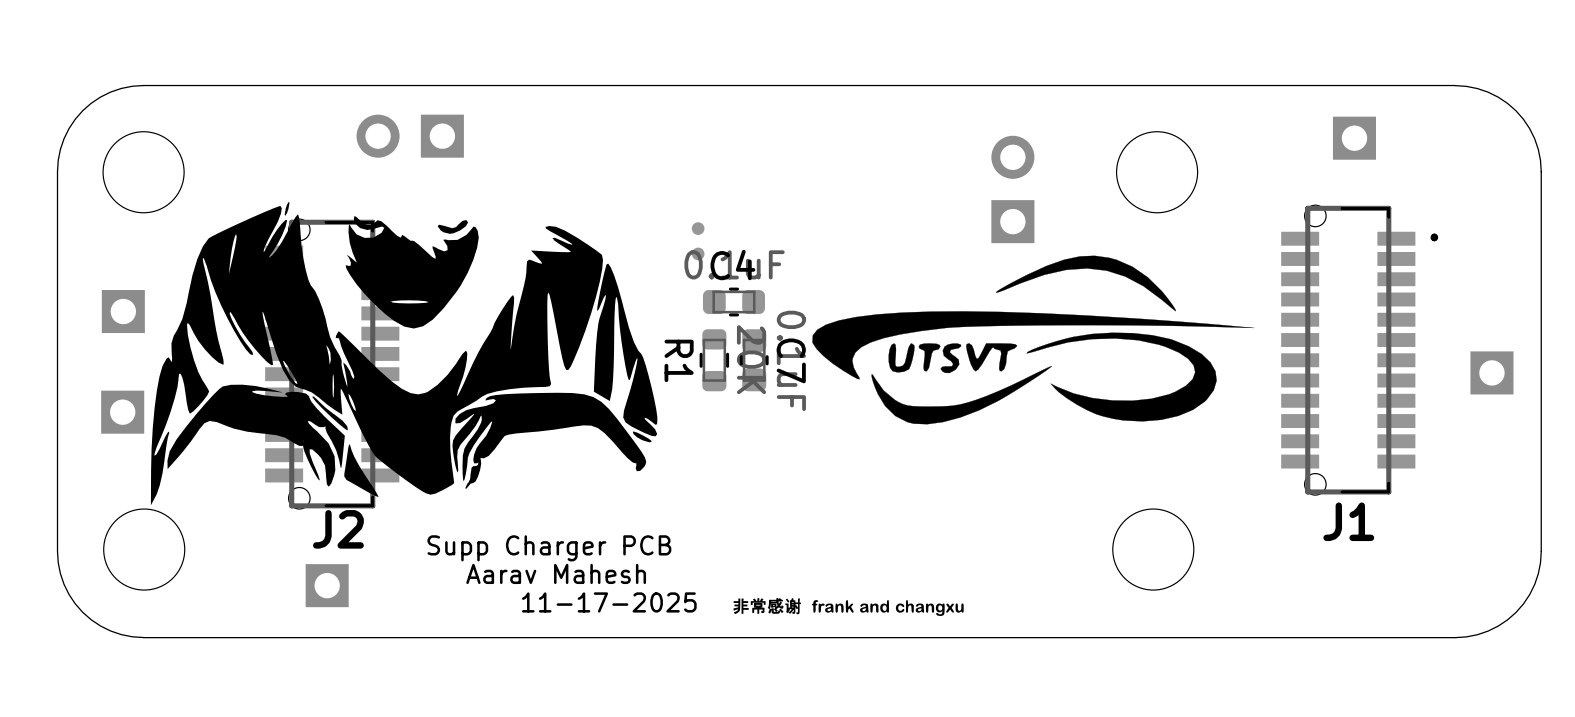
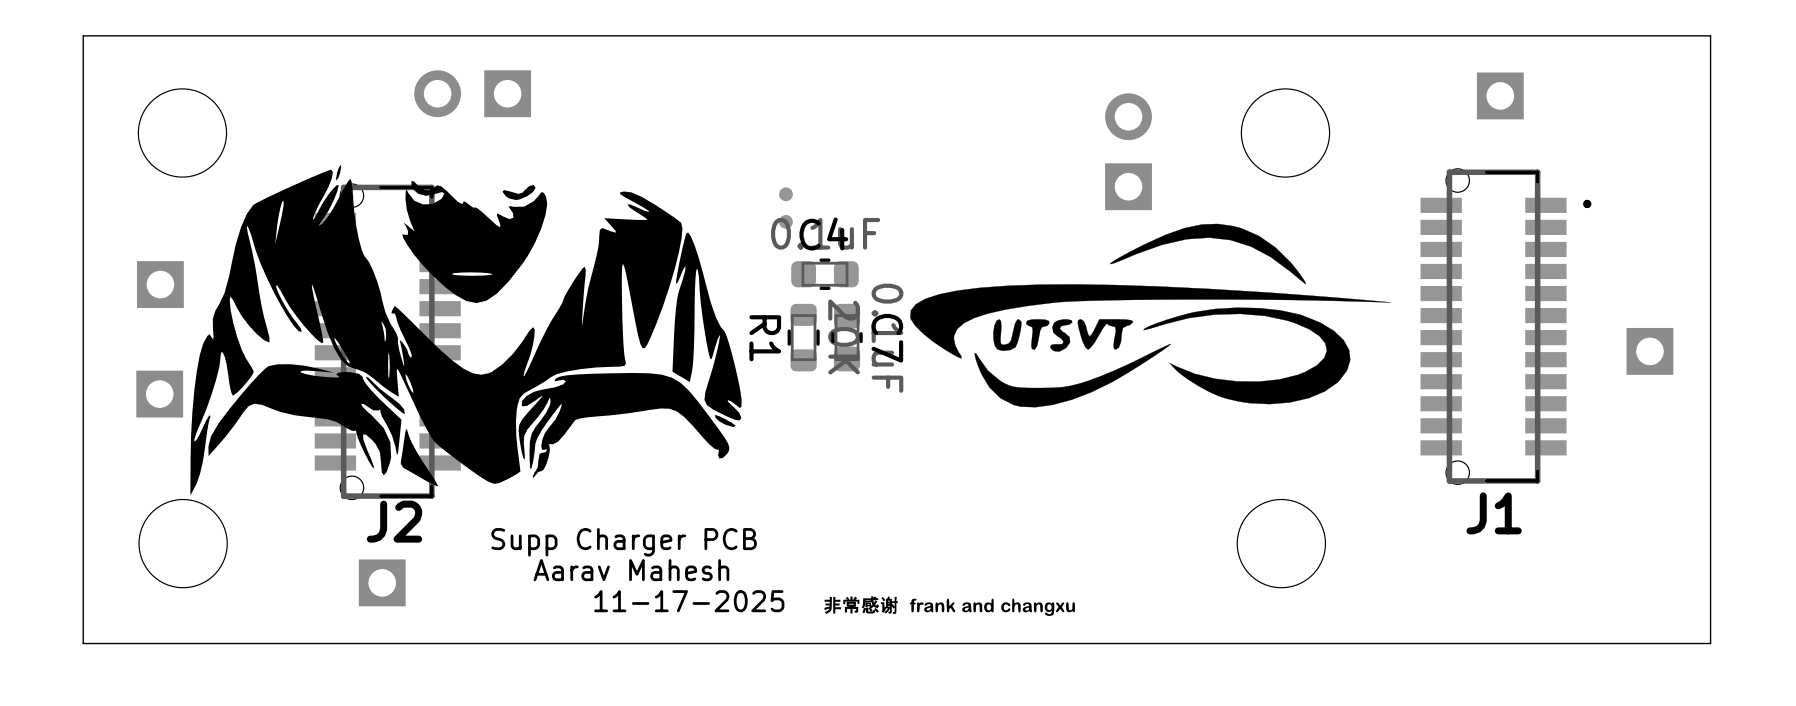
board edge: (1455, 85) (143, 85) (110, 92) (91, 103) (75, 119) (64, 138) (58, 160) (57, 551) (64, 584) (82, 612) (100, 626) (121, 634) (143, 637) (1455, 637) (1488, 631) (1507, 619) (1523, 603) (1534, 584) (1540, 562) (1541, 171) (1534, 138) (1516, 110) (1488, 92) (1455, 85) -> (1710, 35) (1710, 643) (83, 643) (83, 35) (1710, 35)

